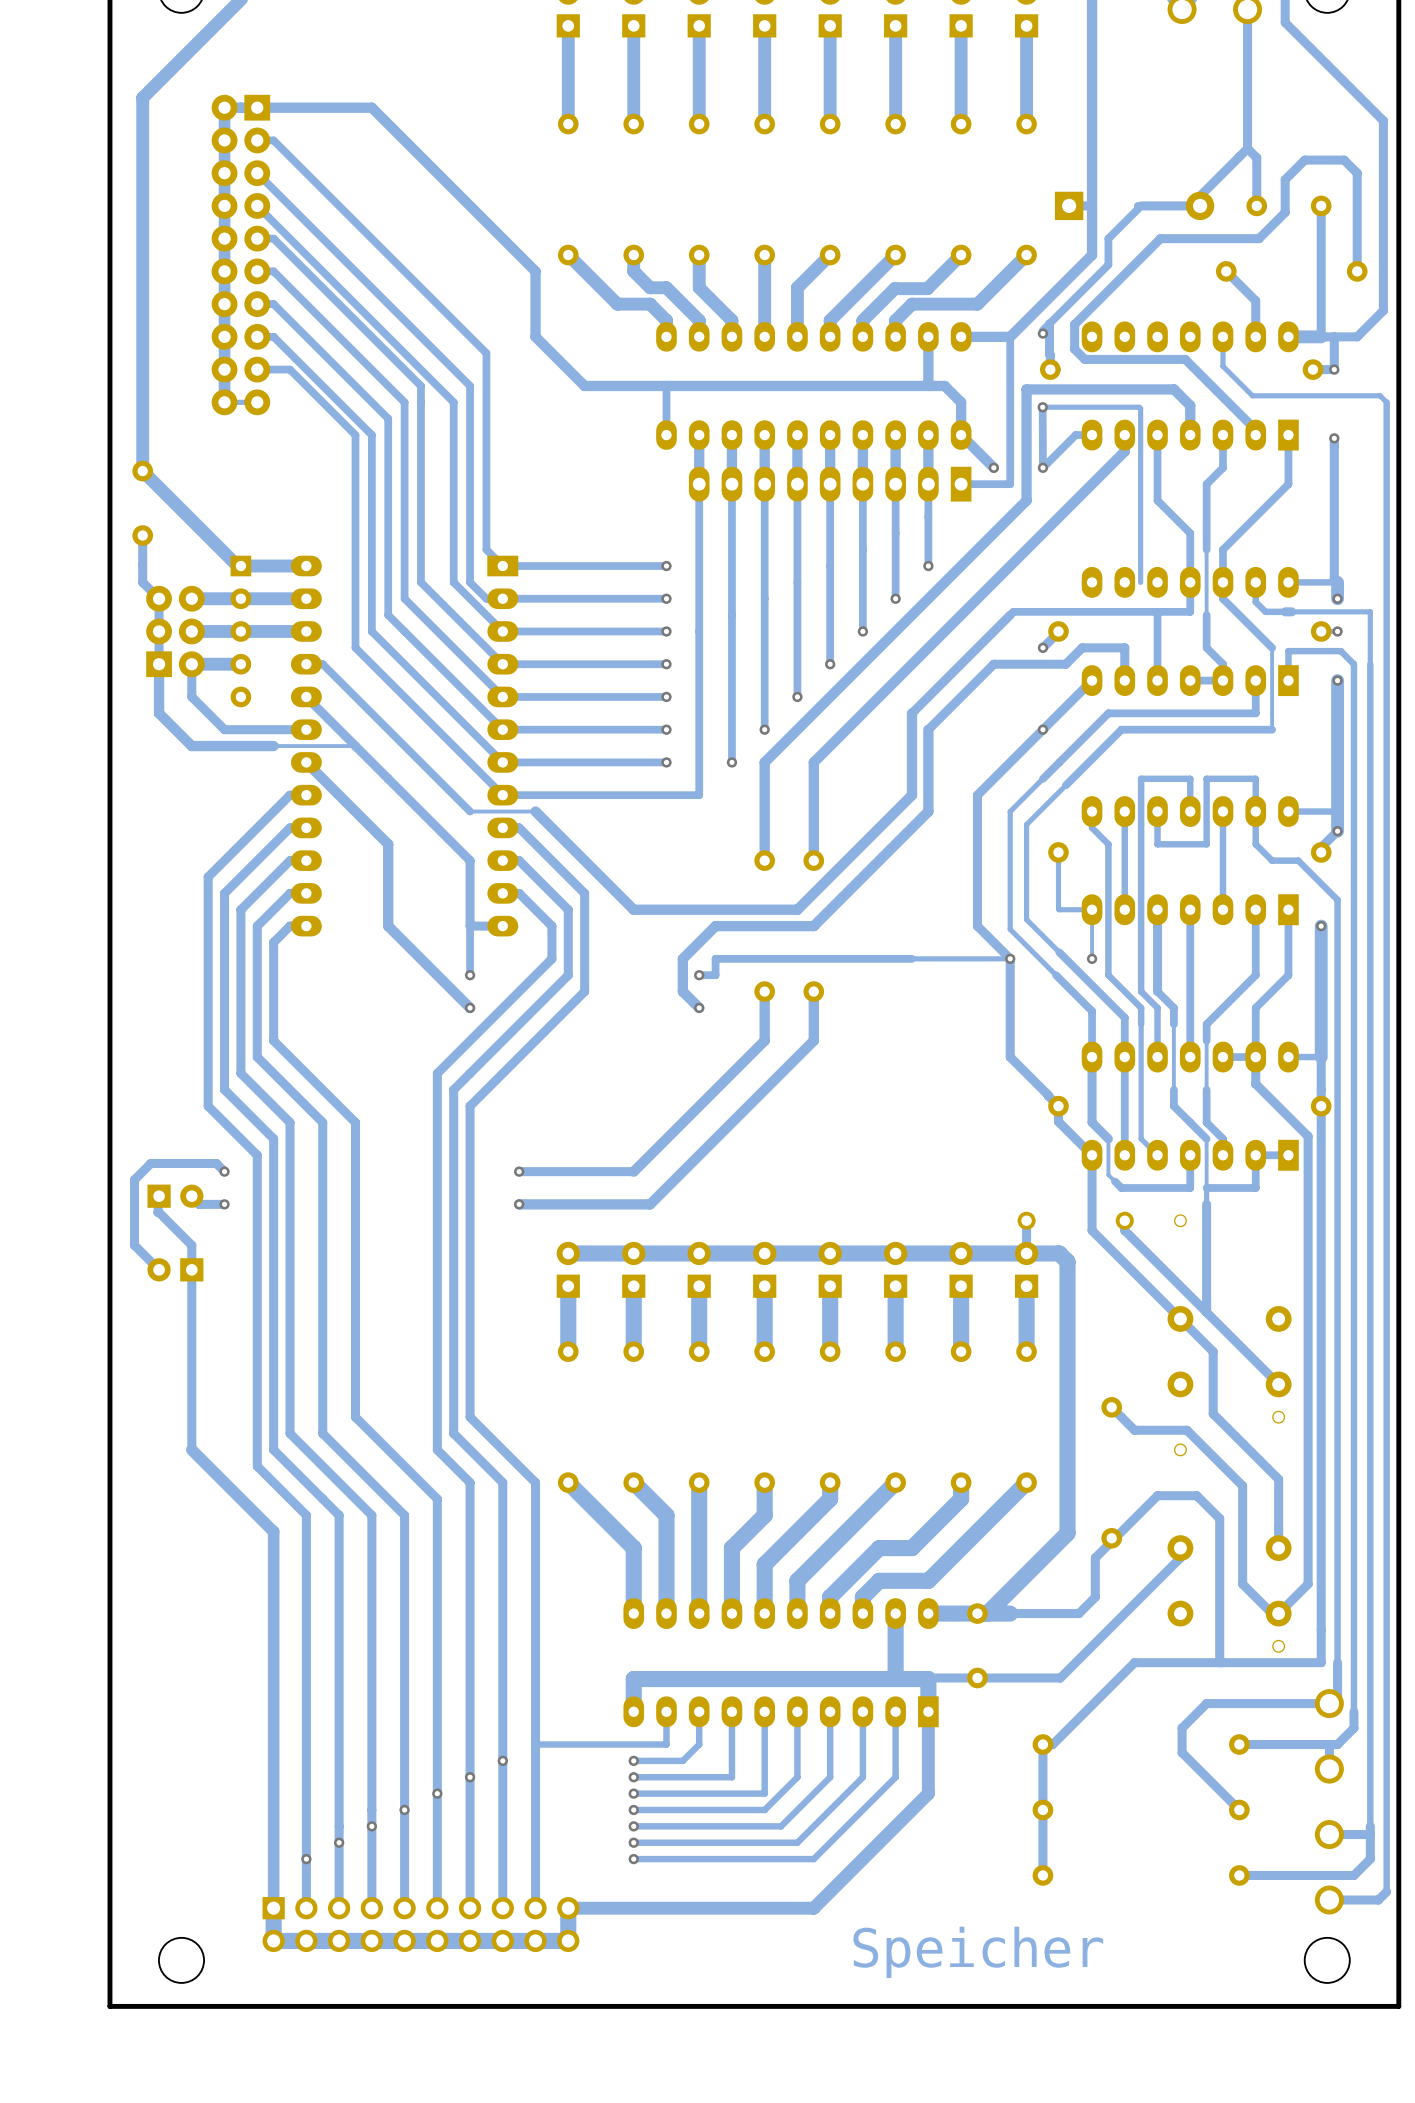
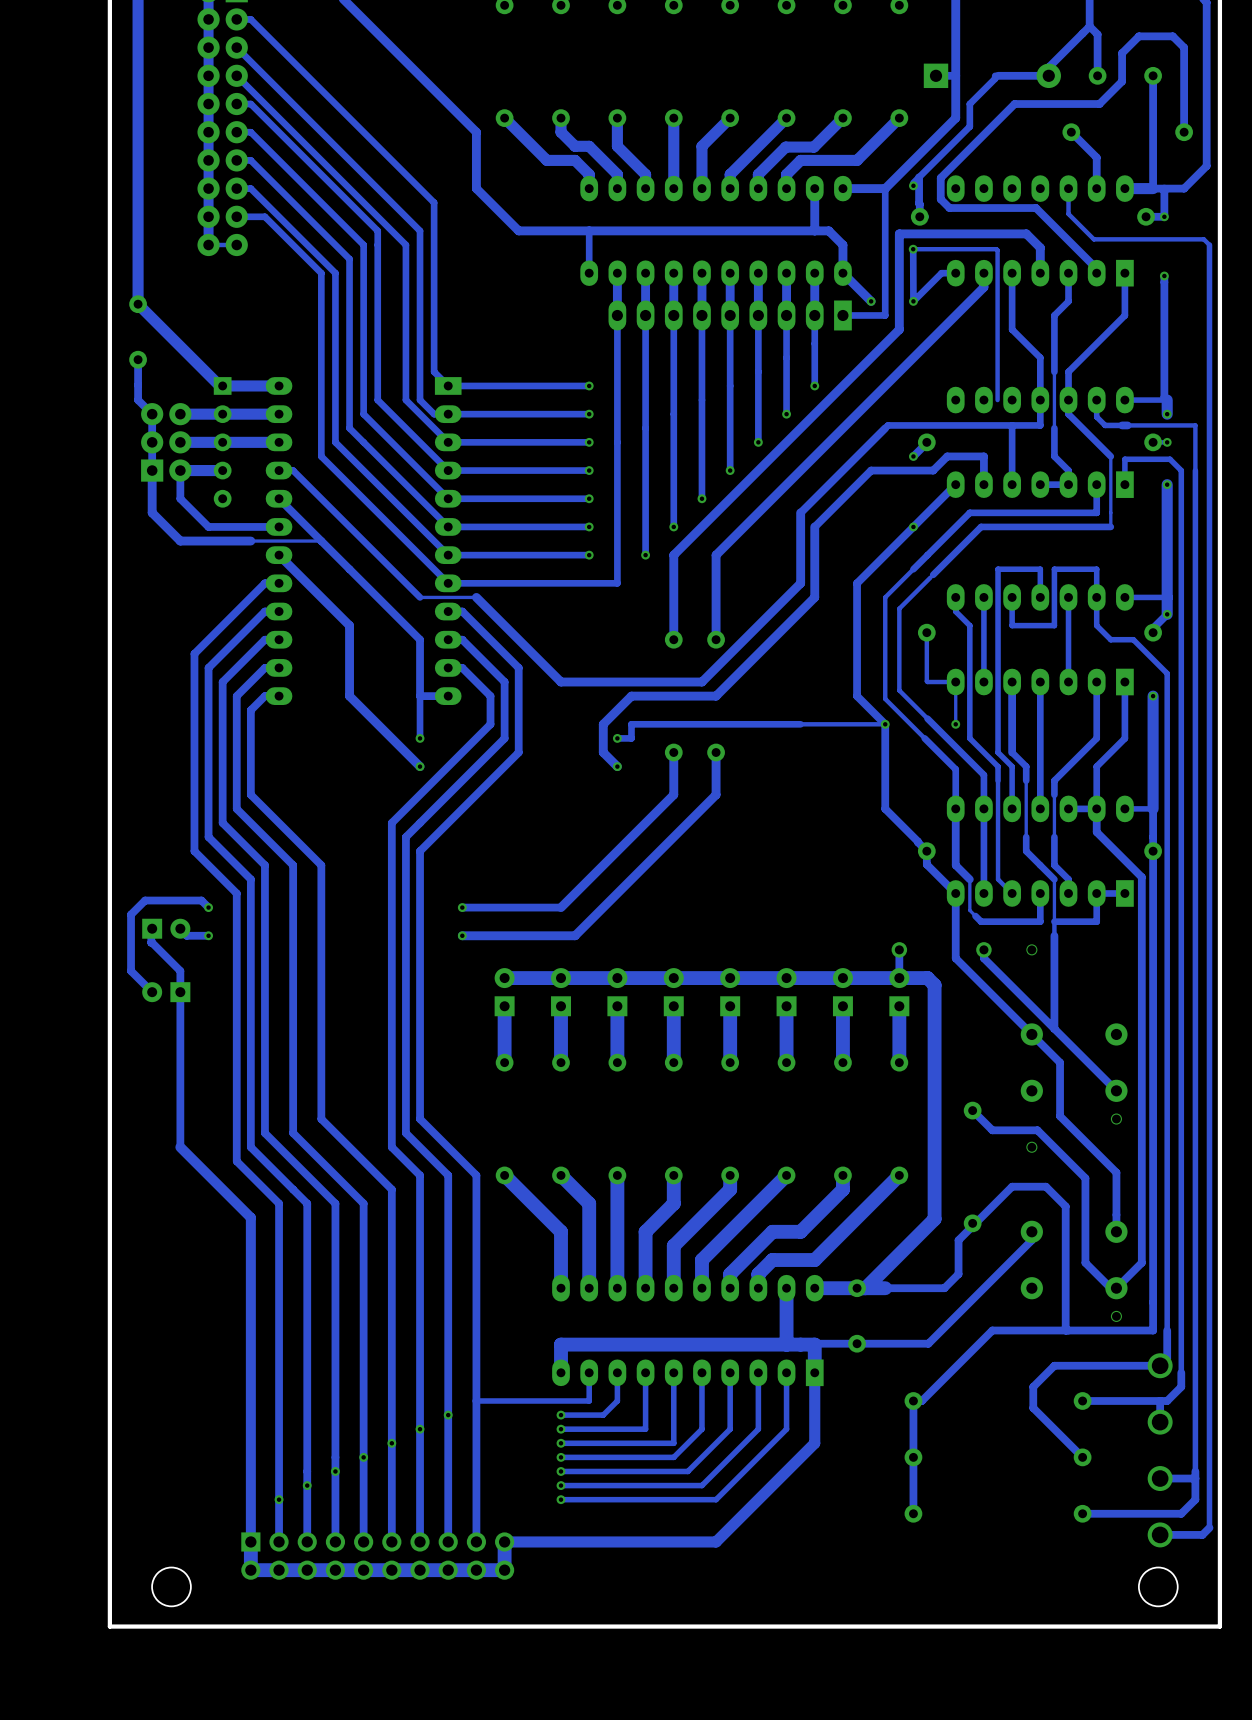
text: Speicher (978, 1952) -> none

